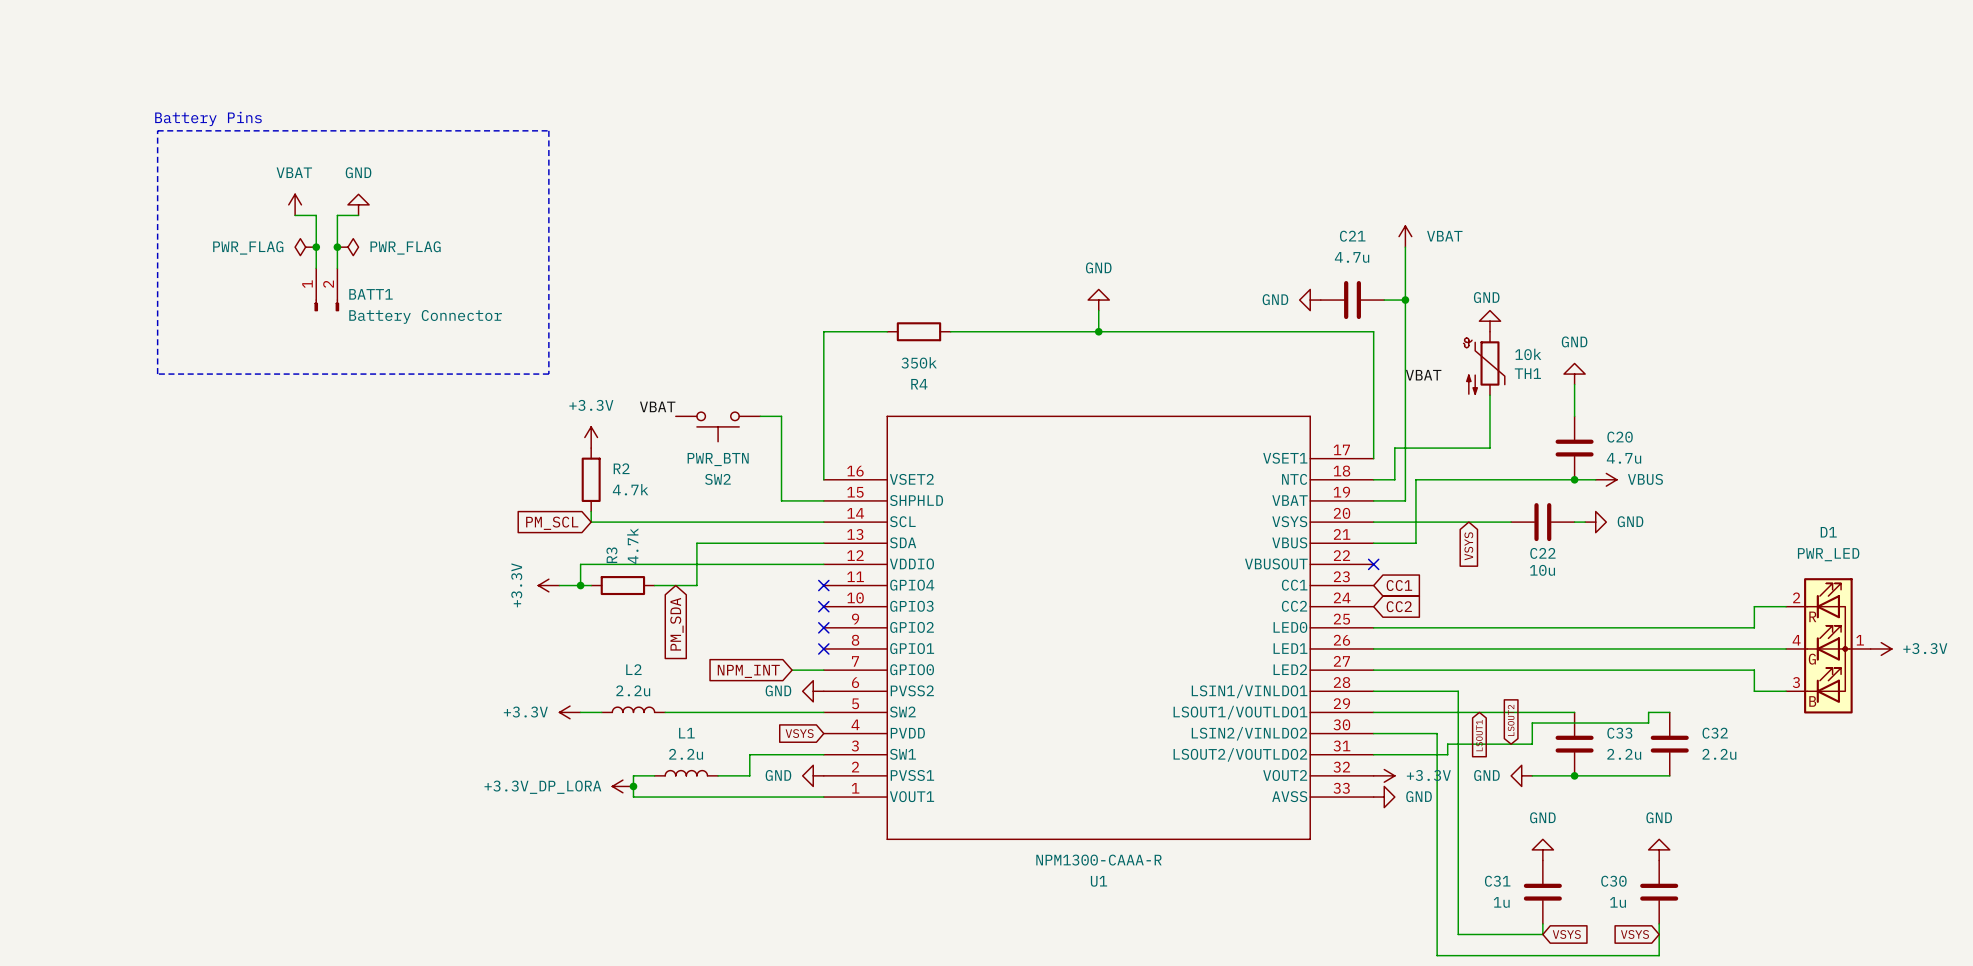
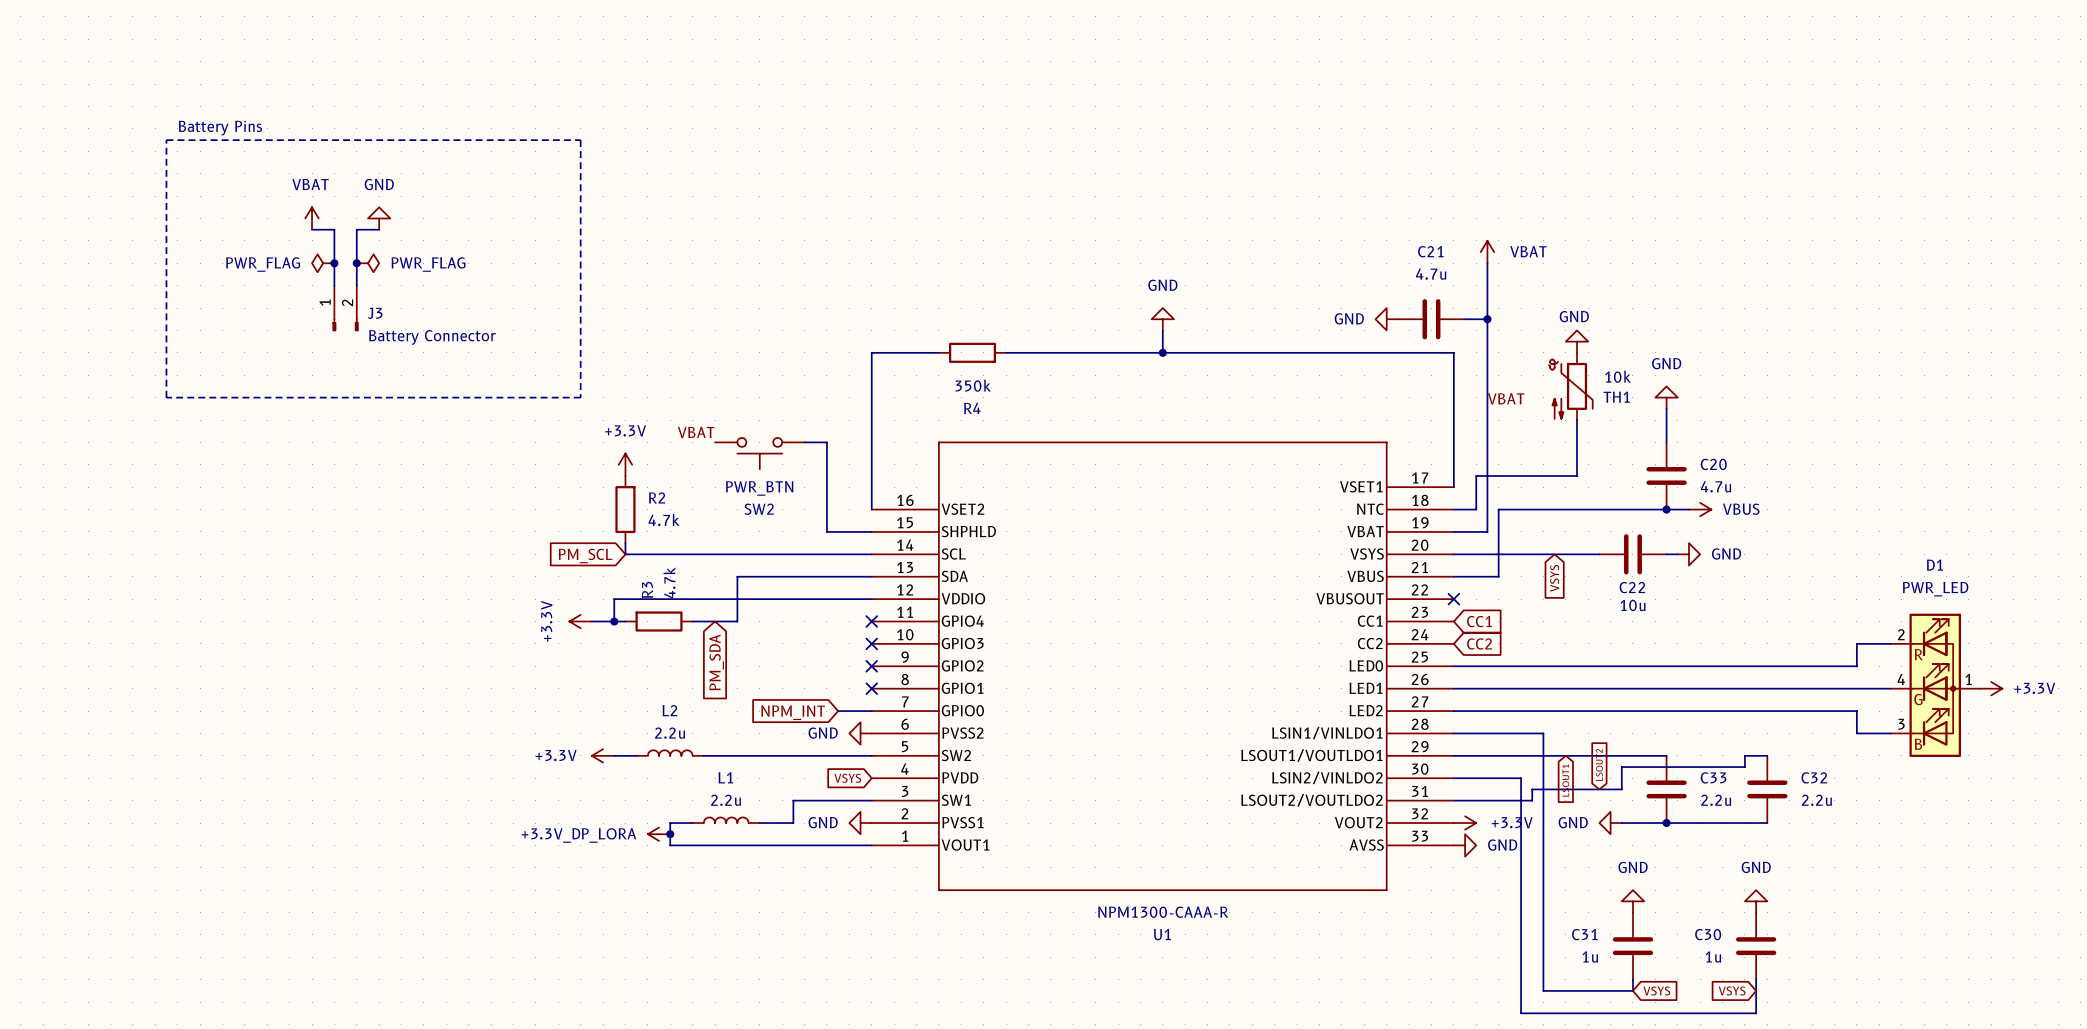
BATT1 name: BATT1 (371, 294) -> J3 (375, 313)

